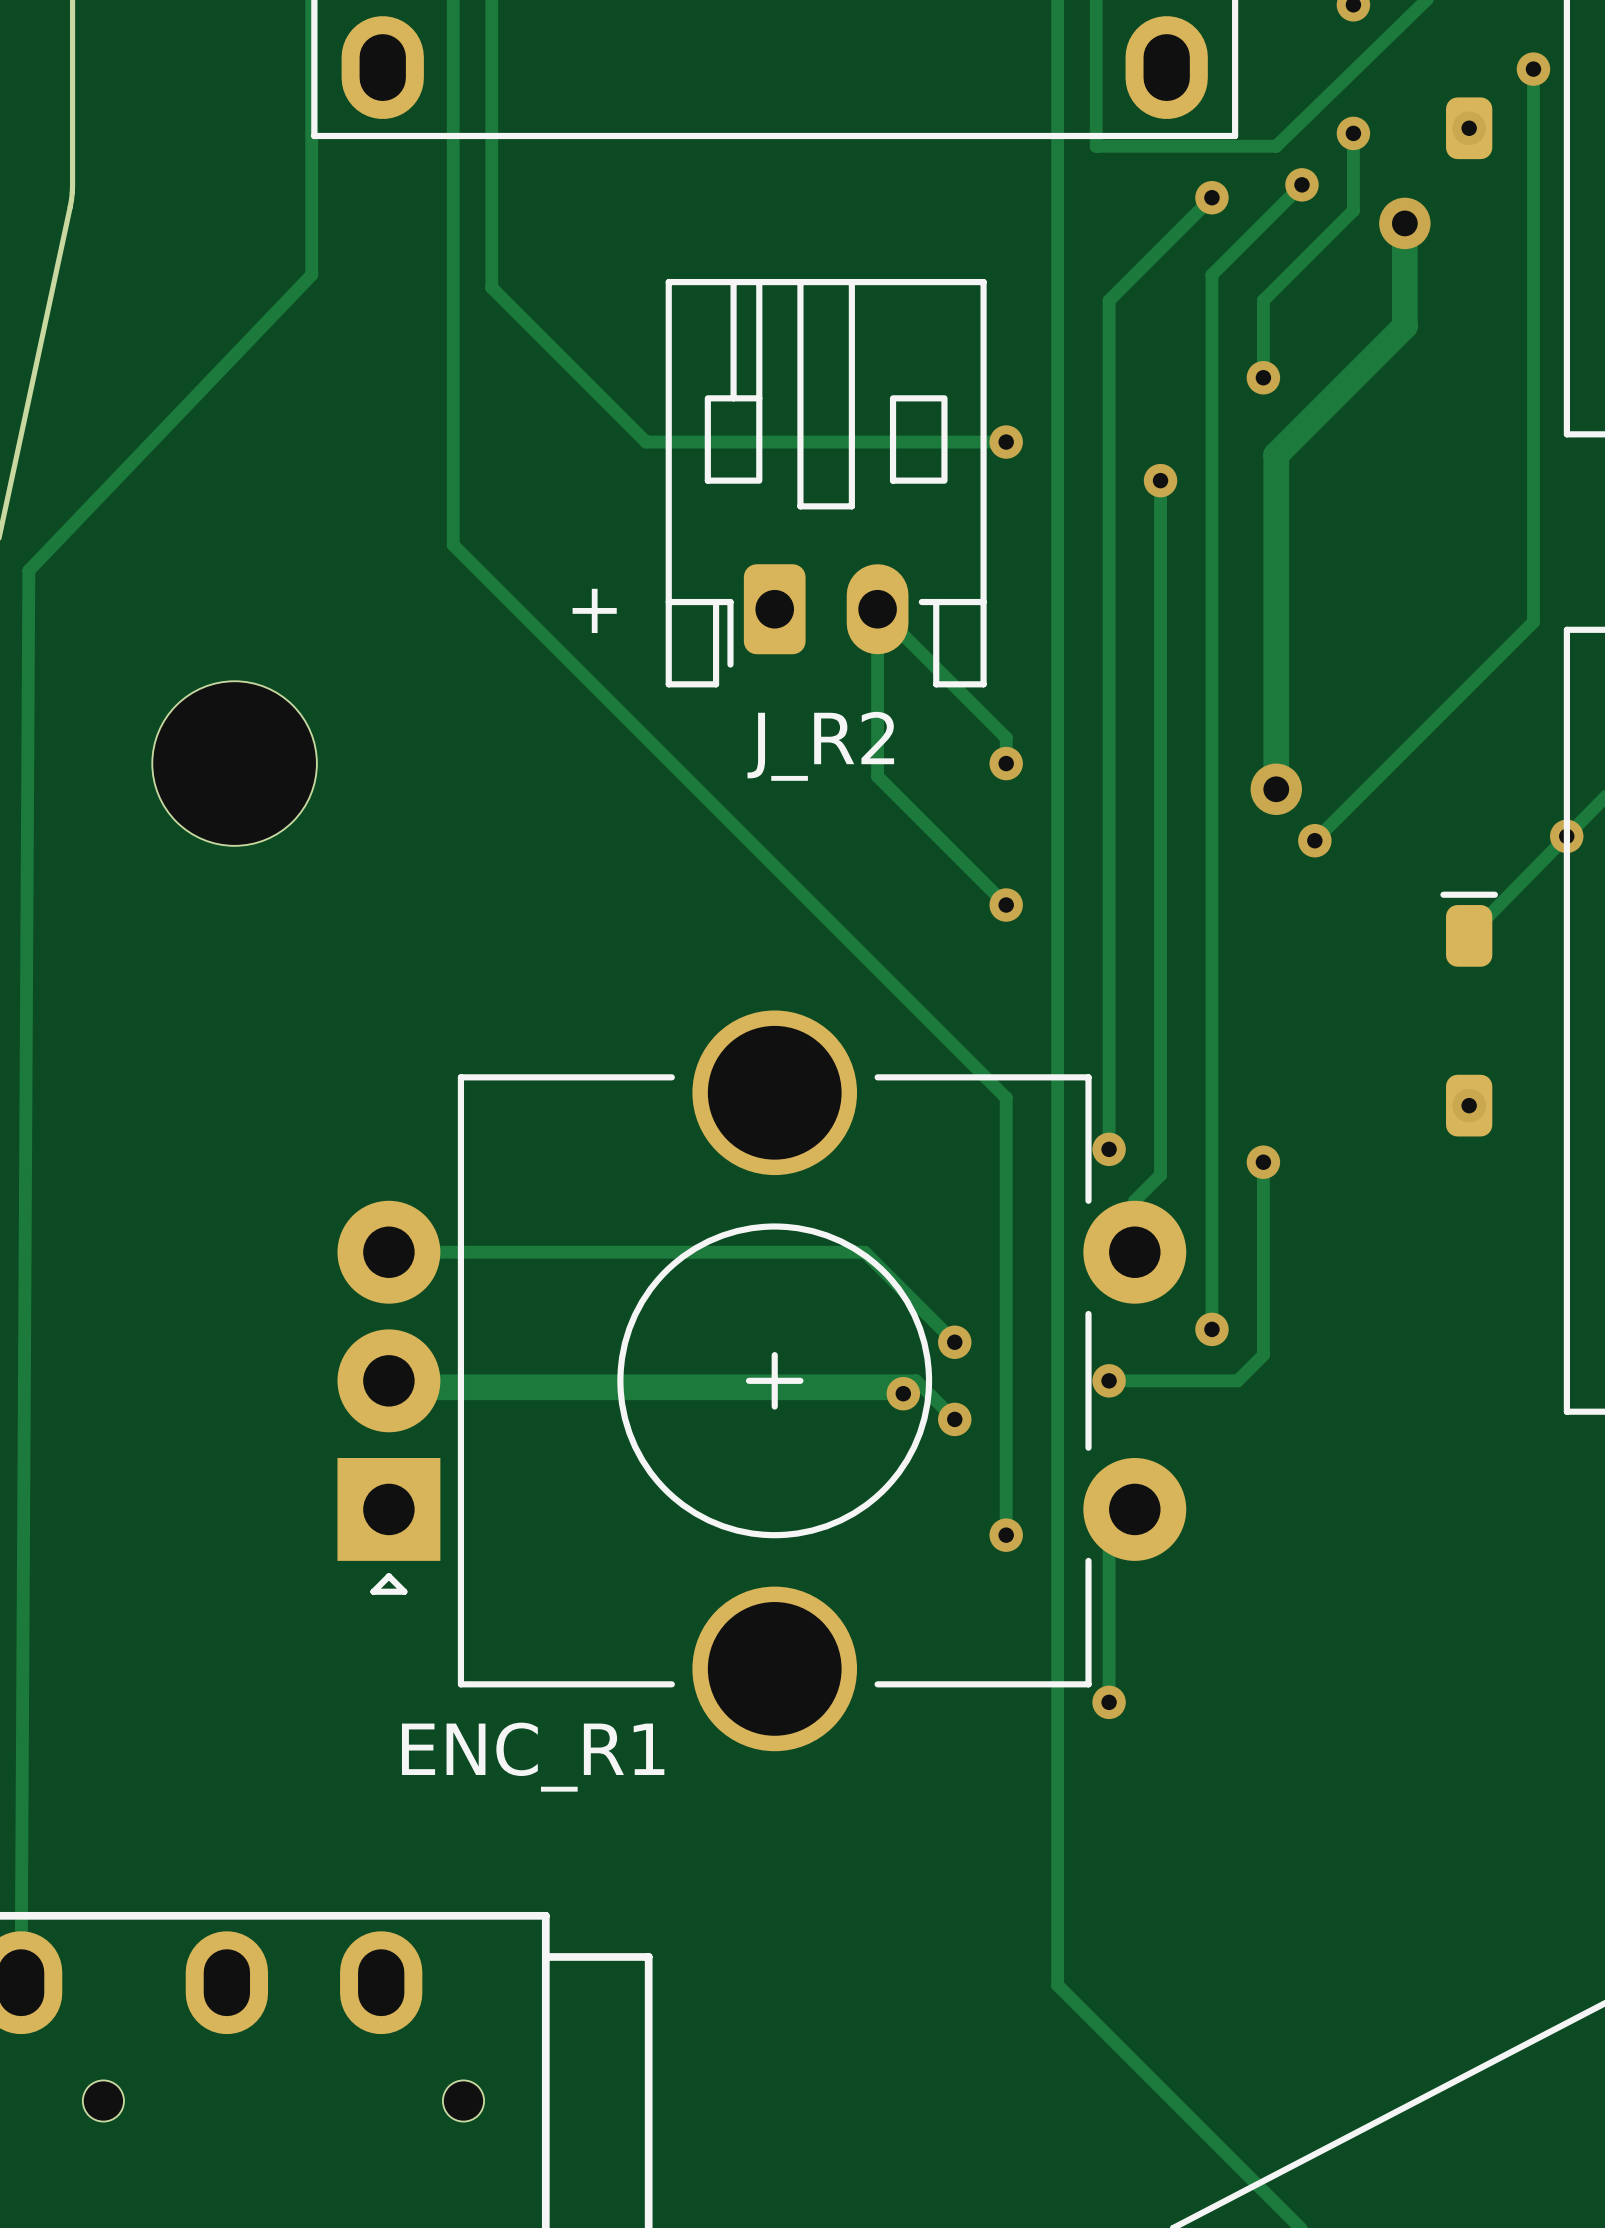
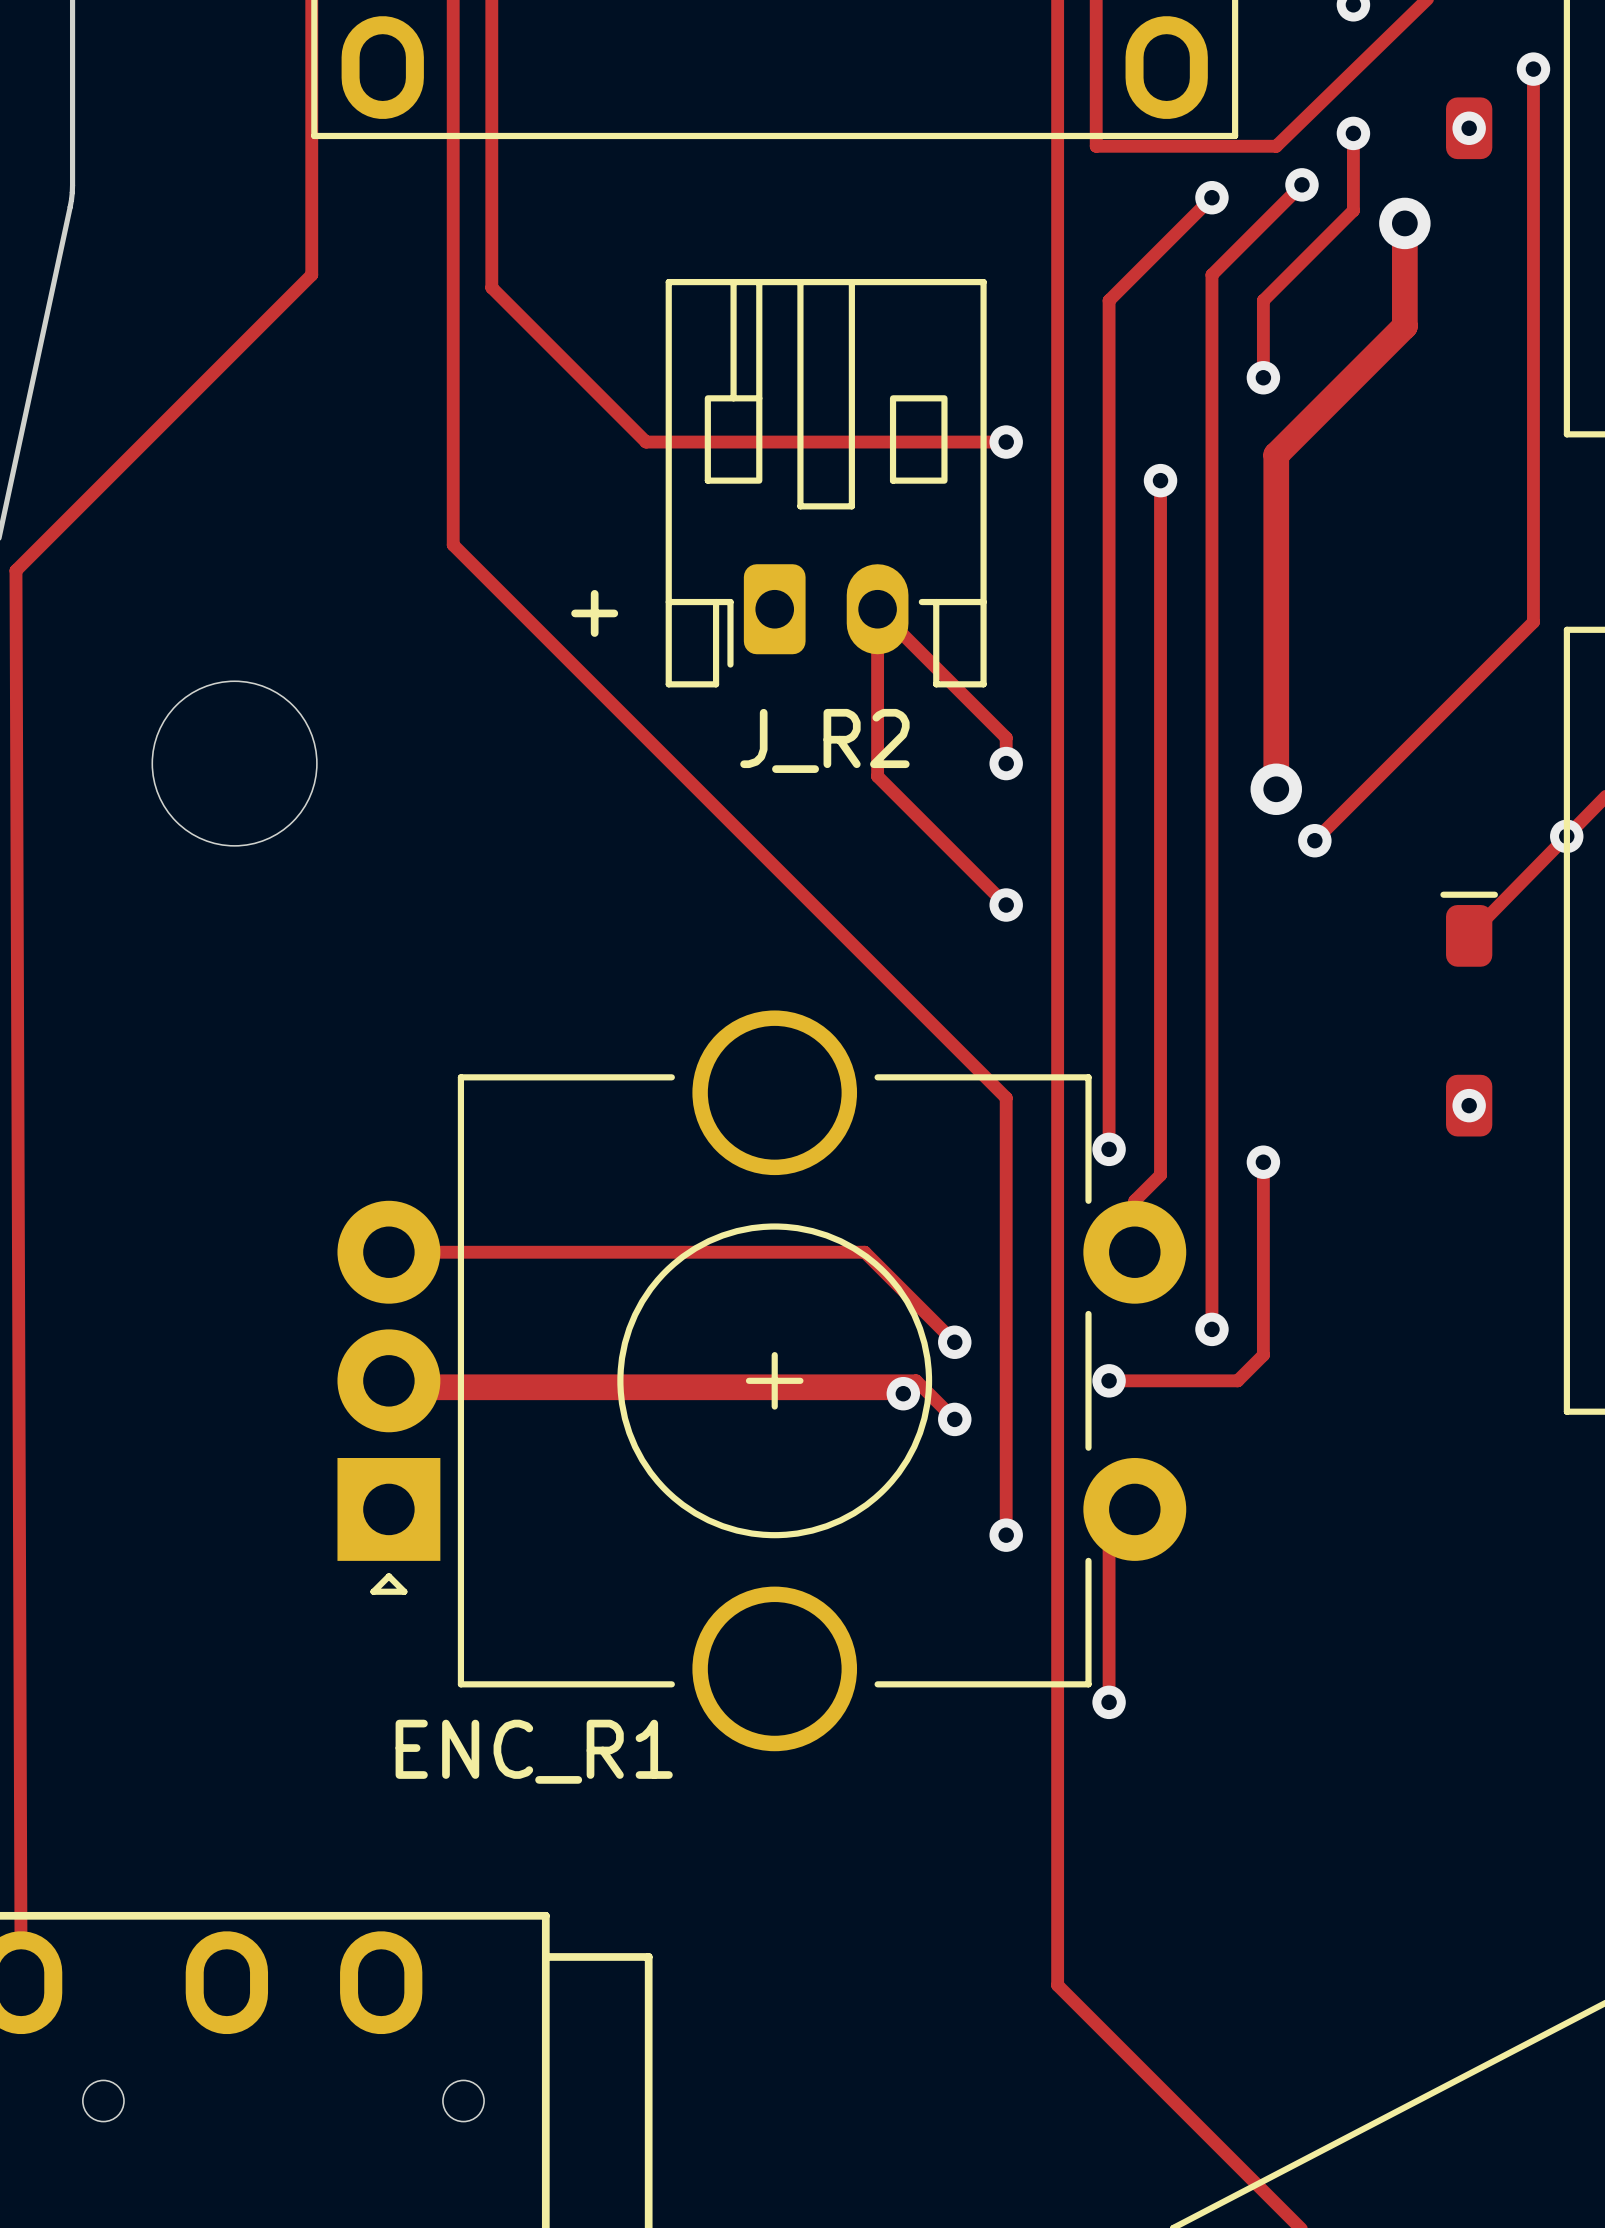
track: (311, 274) (28, 570) (21, 1982) -> (311, 274) (15, 570) (21, 1982)

